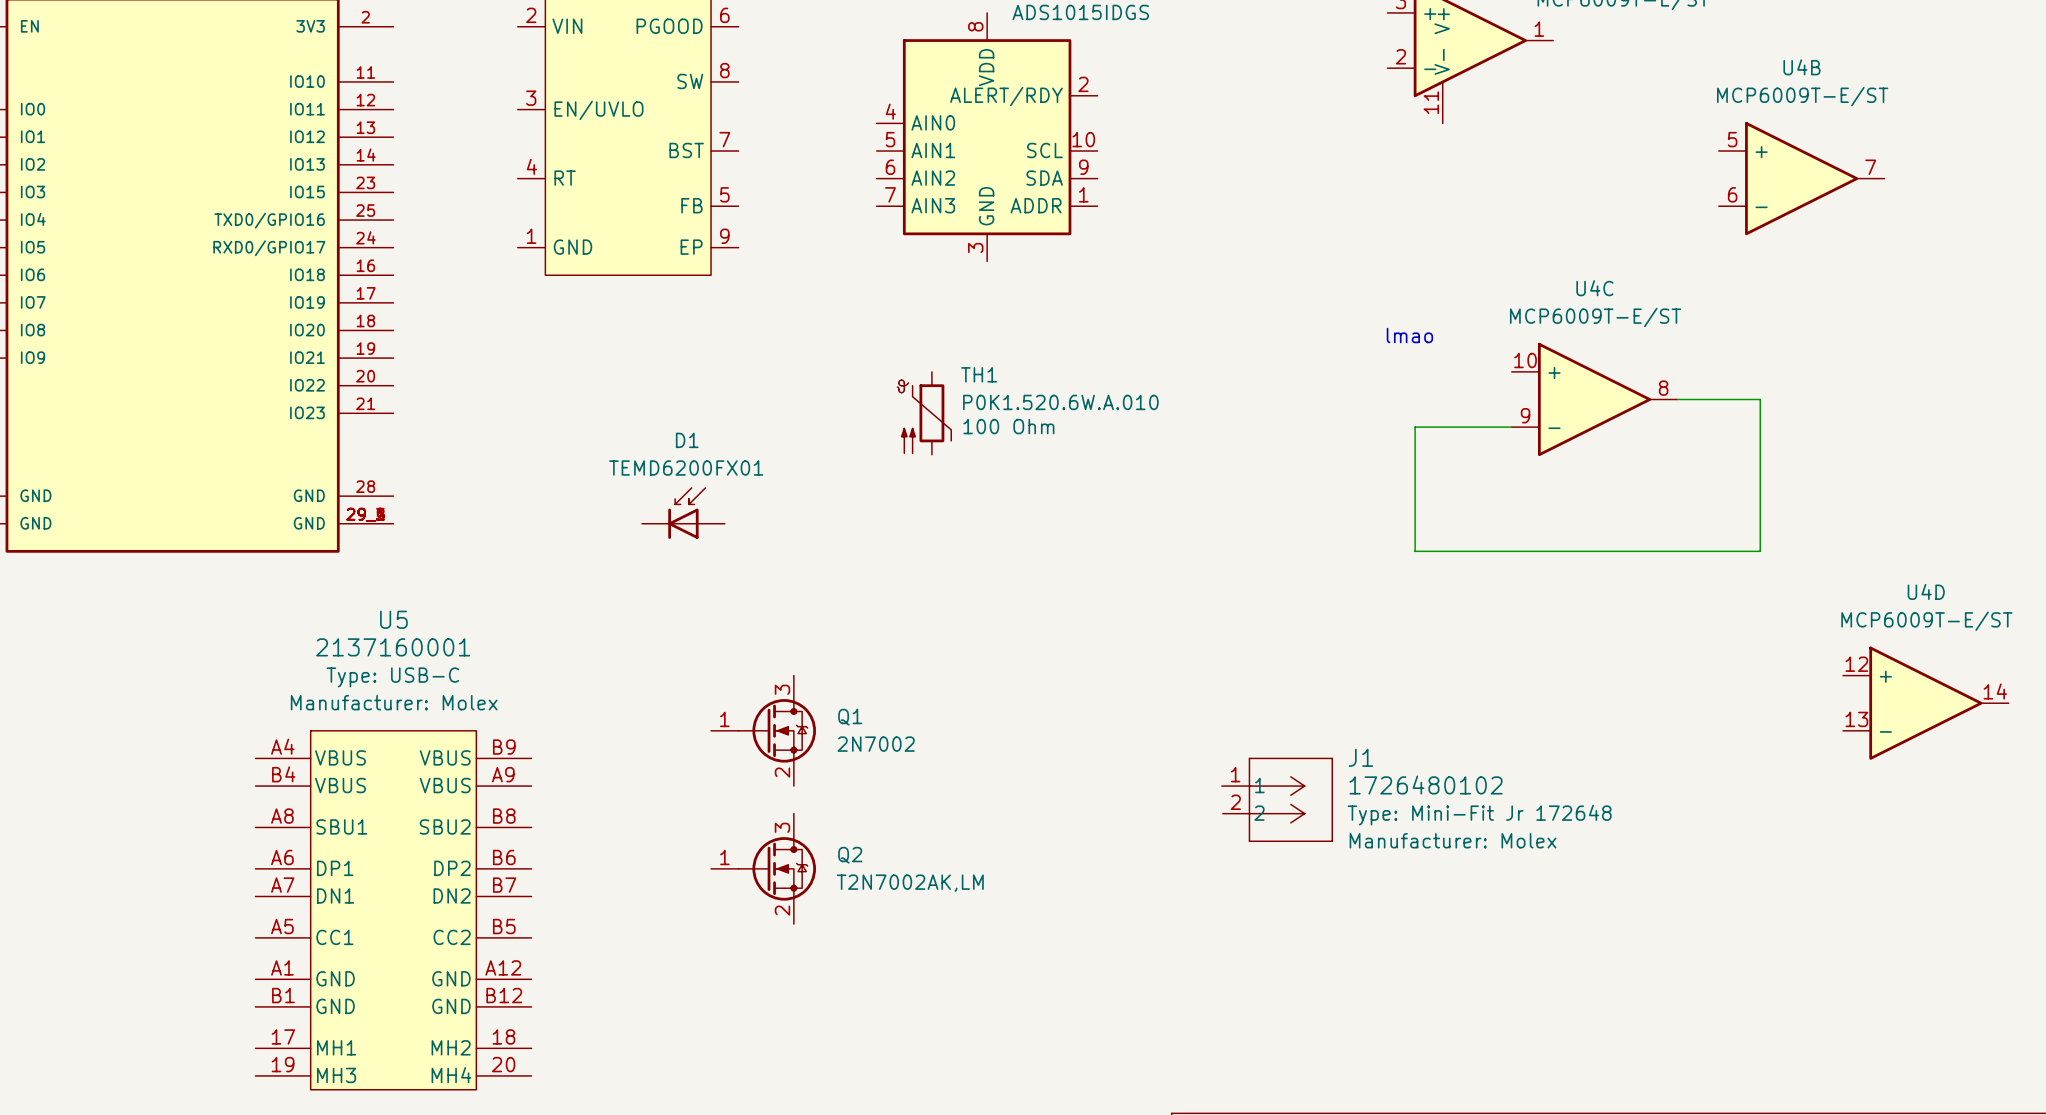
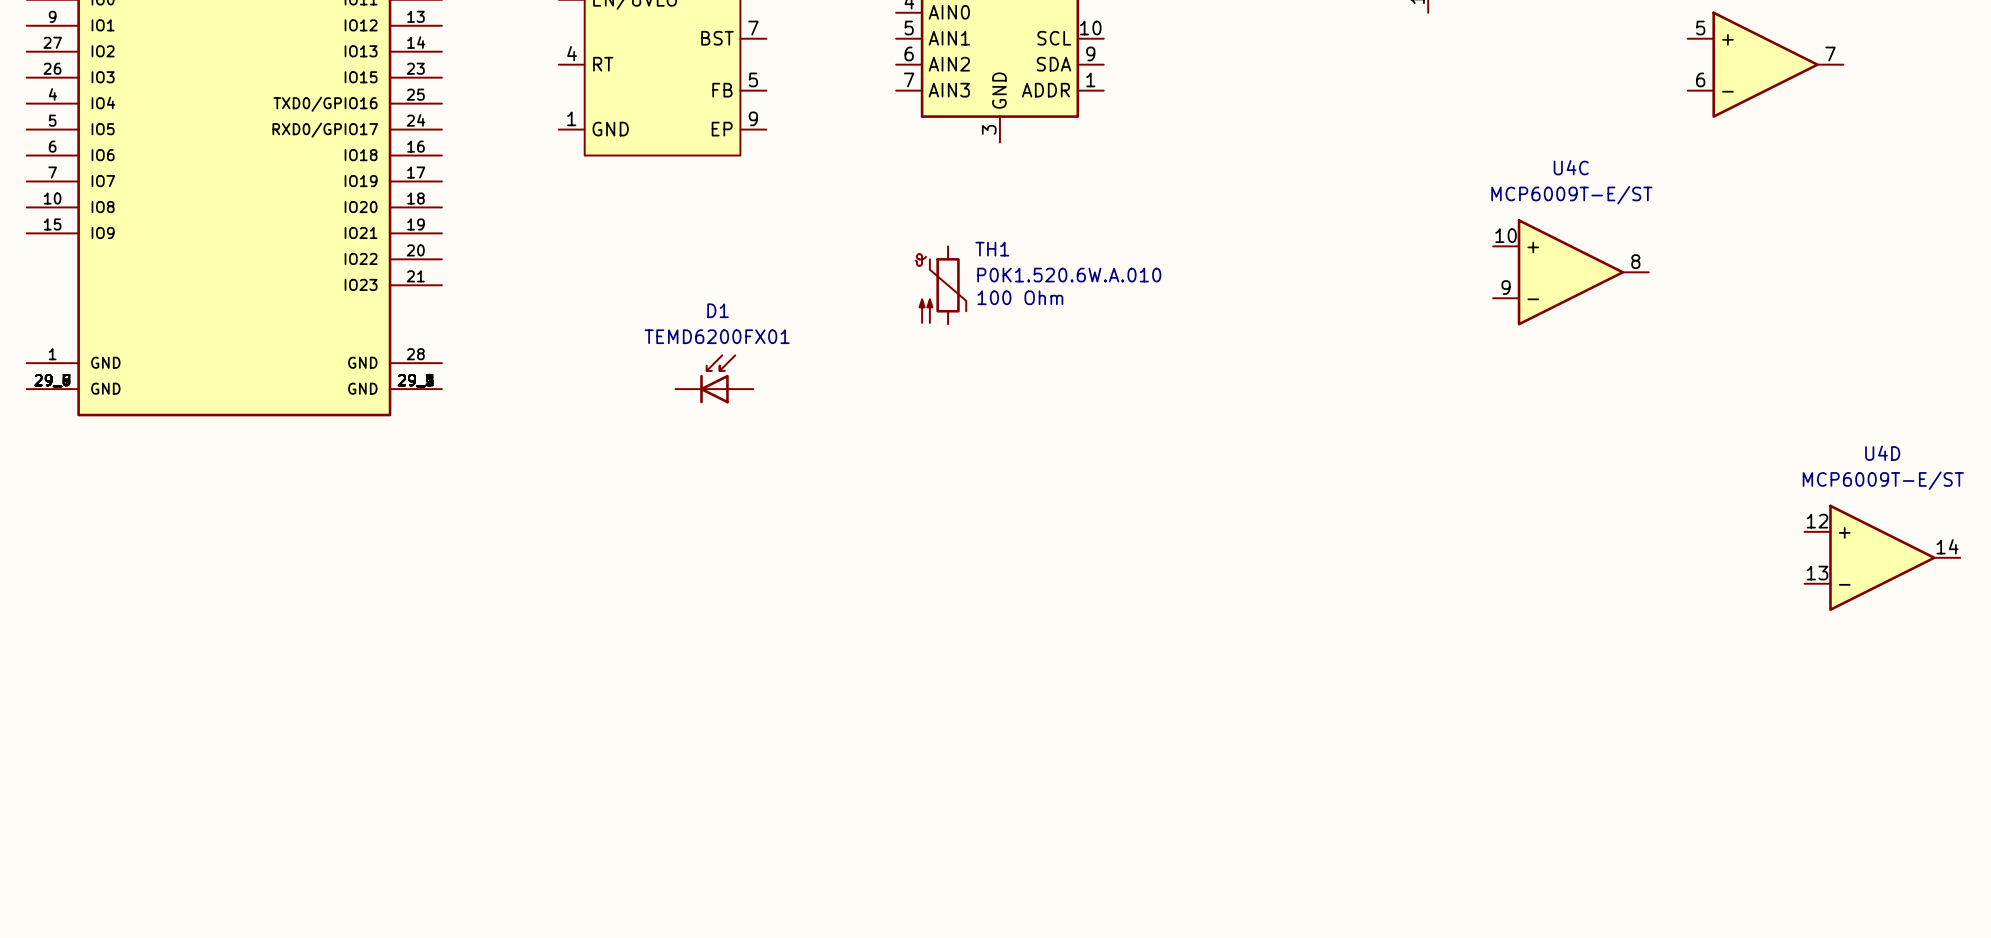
text: lmao (1409, 335) -> none
wire: (1677, 399) (1760, 399) (1760, 551) (1415, 551) (1415, 427) (1511, 427) -> none
Q1: 2N7002 (763, 730) -> none
J1: 1726480102 (1277, 799) -> none
Q2: T2N7002AK,LM (763, 868) -> none
U5: 2137160001 (393, 910) -> none

